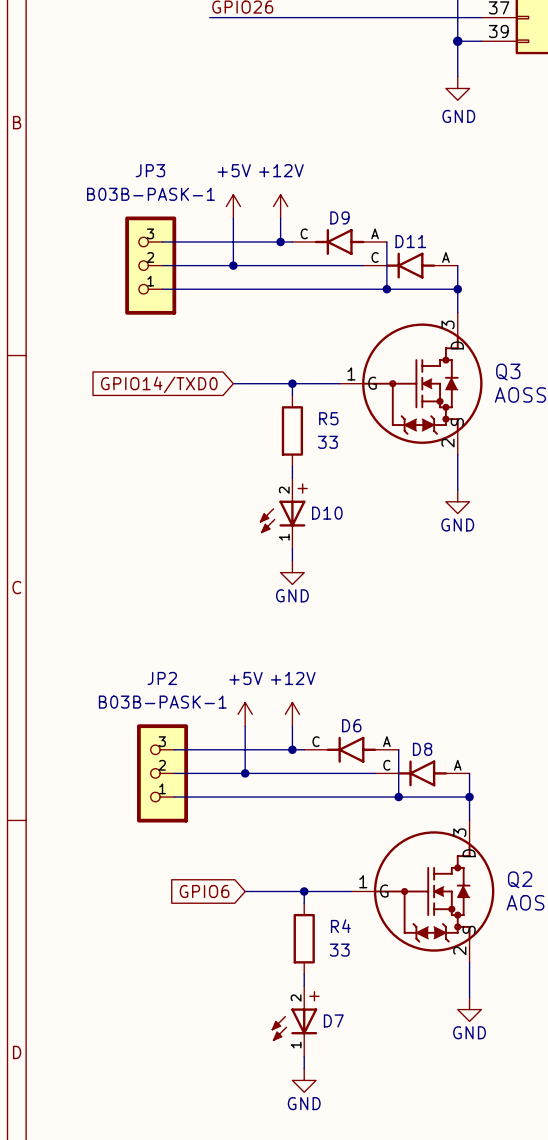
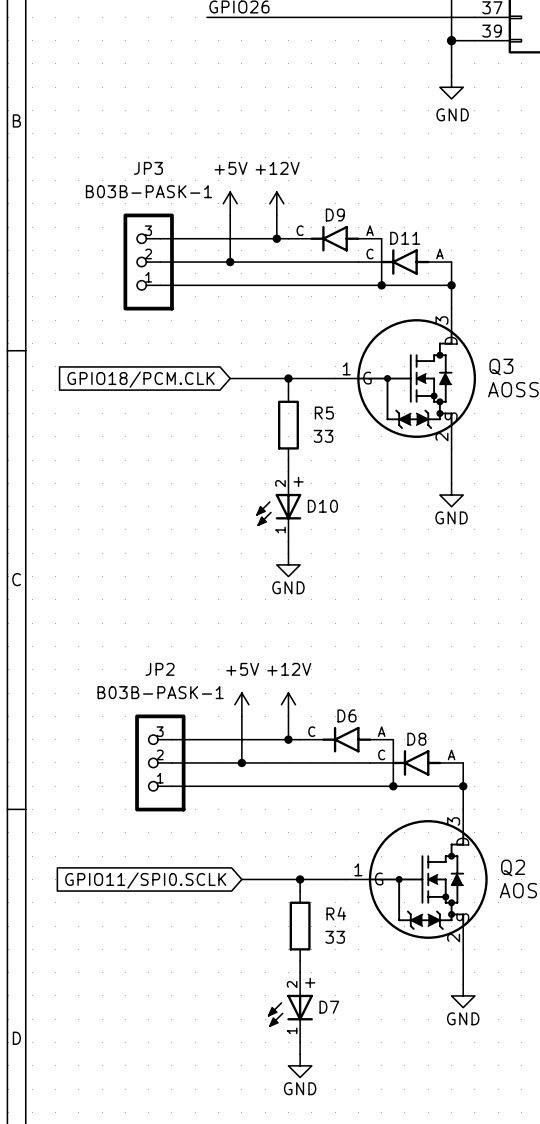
global label: GPIO14/TXD0 (159, 384) -> GPIO18/PCM.CLK (141, 379)
global label: GPIO6 (204, 891) -> GPIO11/SPI0.SCLK (145, 880)

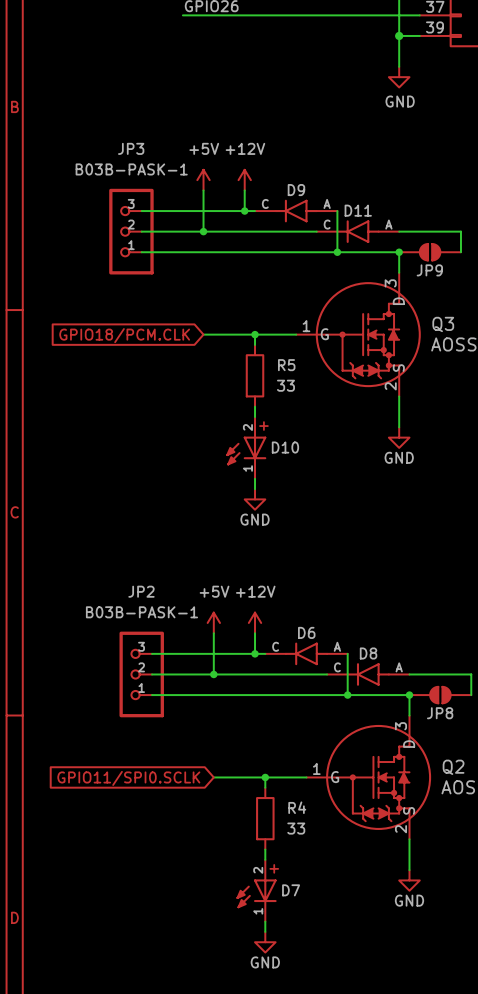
wire: (451, 262) (451, 285) -> (399, 231) (460, 231) (460, 252)
JP9: none -> (430, 252)
wire: (463, 762) (463, 786) -> (409, 674) (471, 674) (471, 695)
JP8: none -> (440, 695)

